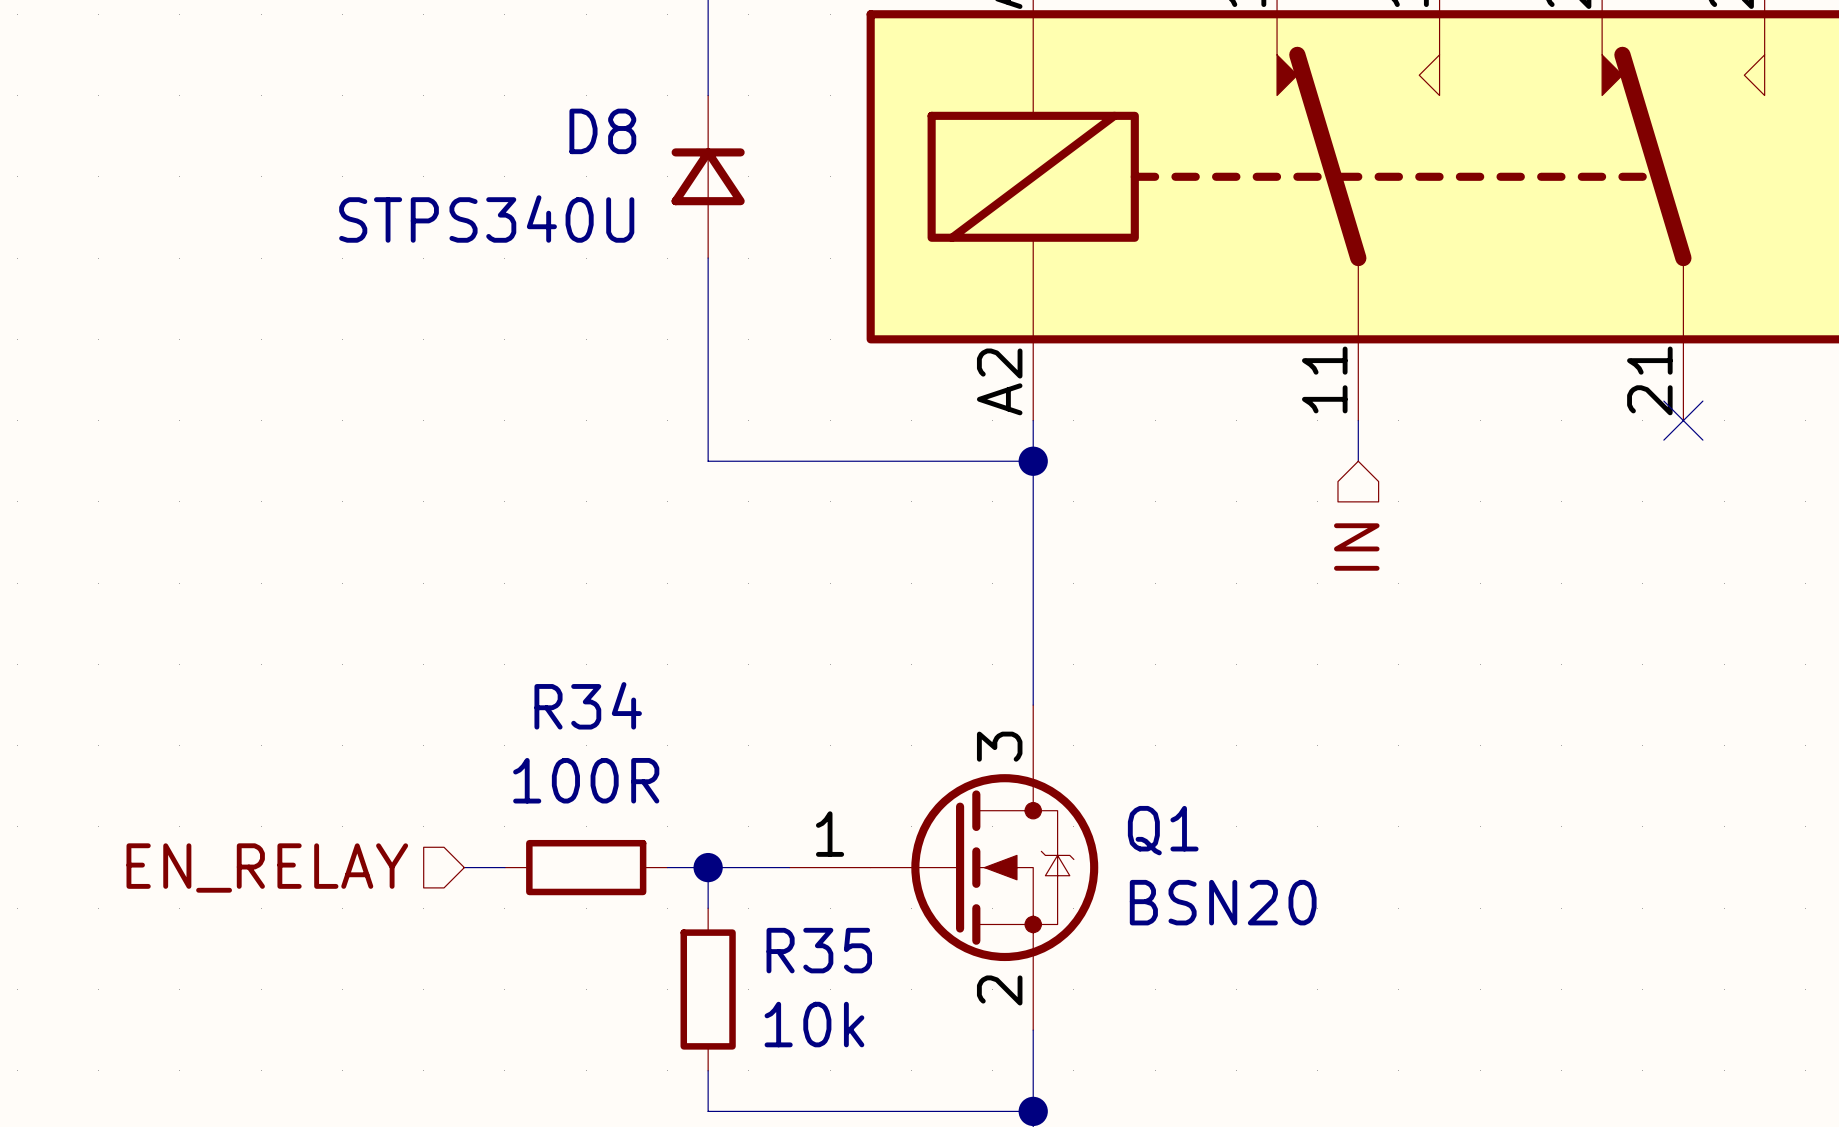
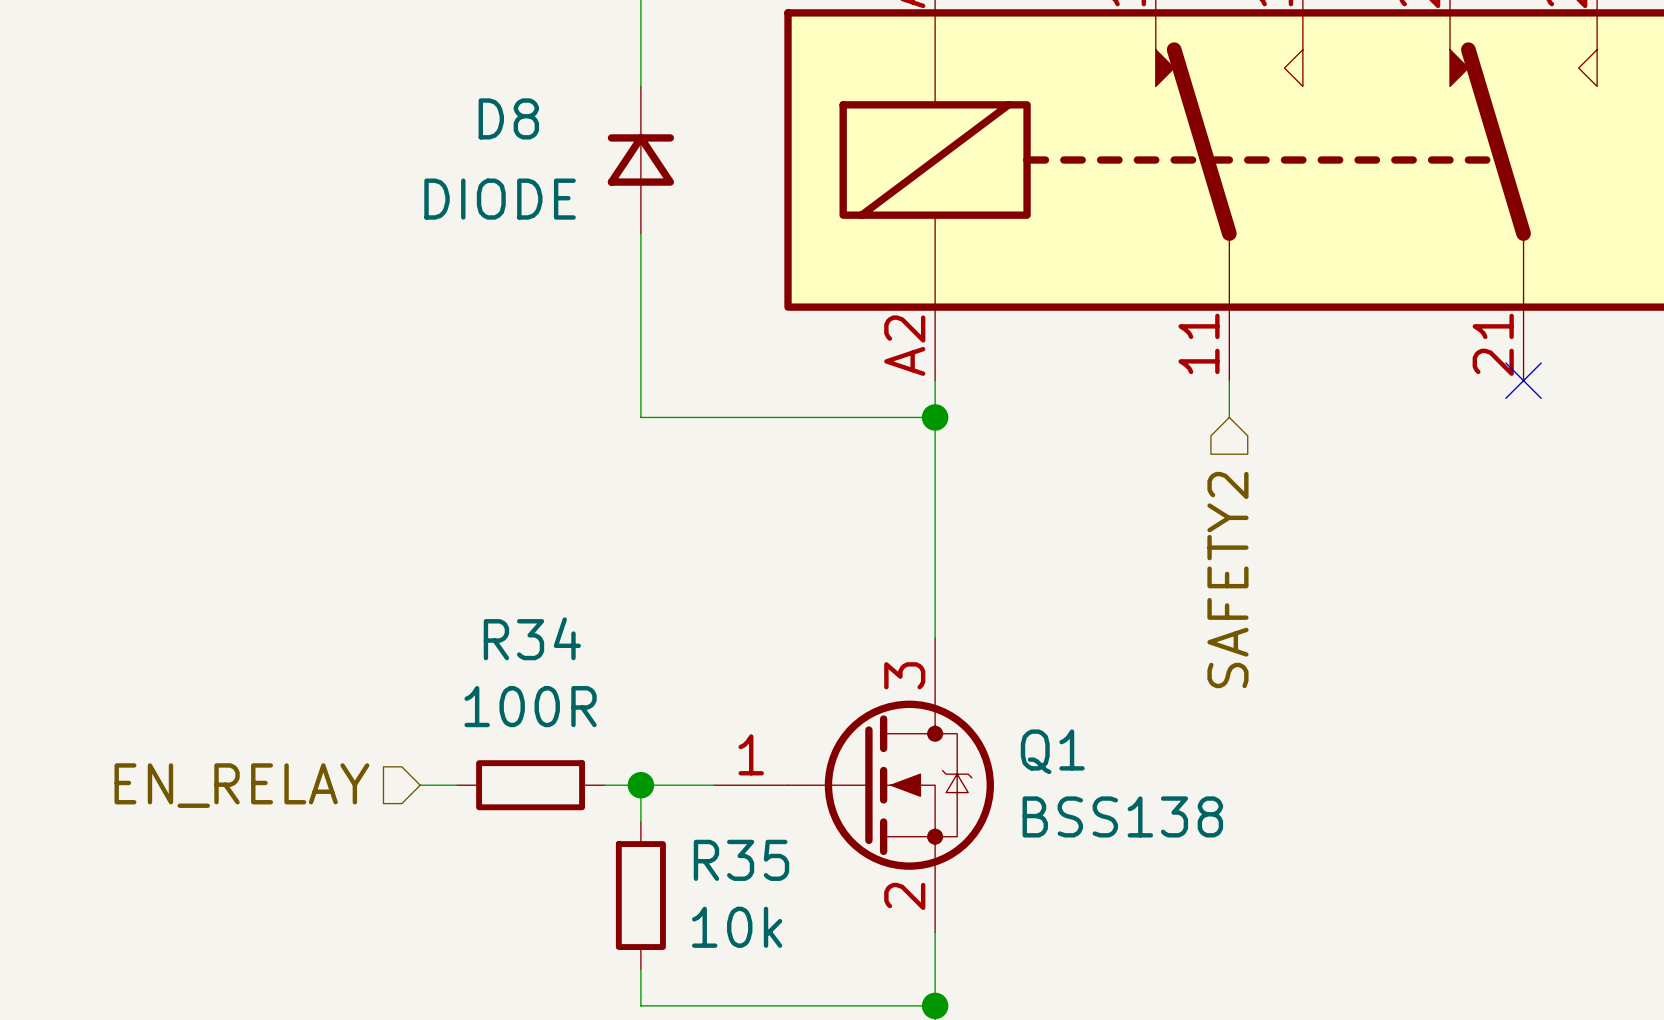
D8 name position: D8 (602, 131) -> D8 (508, 118)
D8 value: STPS340U (486, 219) -> DIODE (500, 199)
hierarchical label: IN (1356, 547) -> SAFETY2 (1227, 580)
Q1 value: BSN20 (1223, 902) -> BSS138 (1122, 816)

